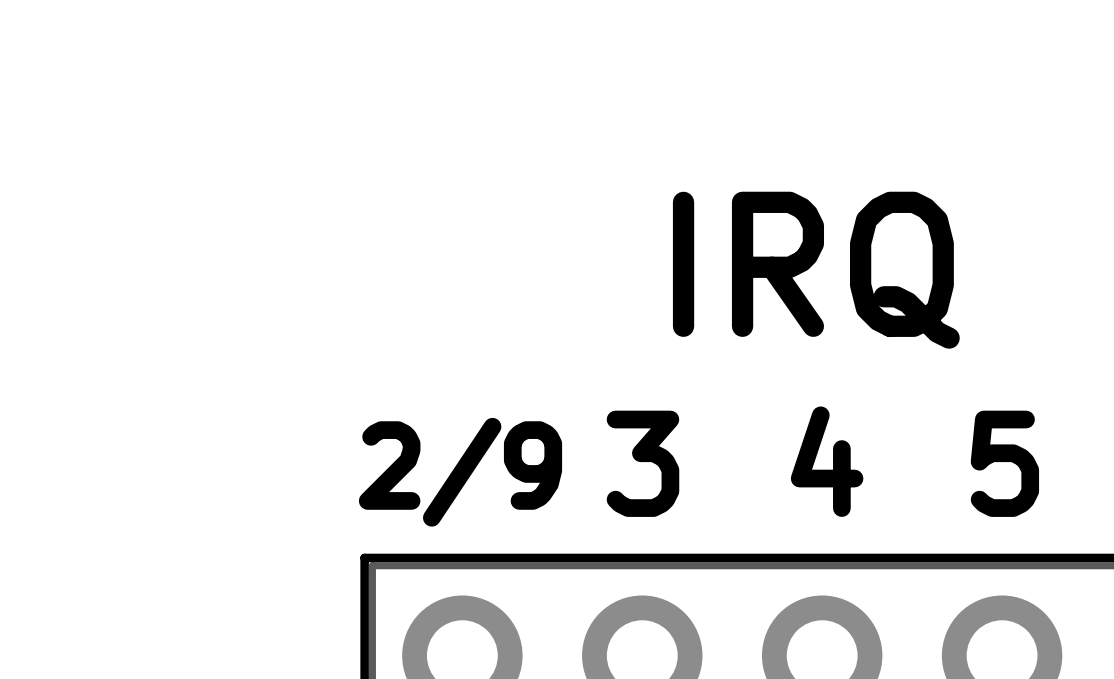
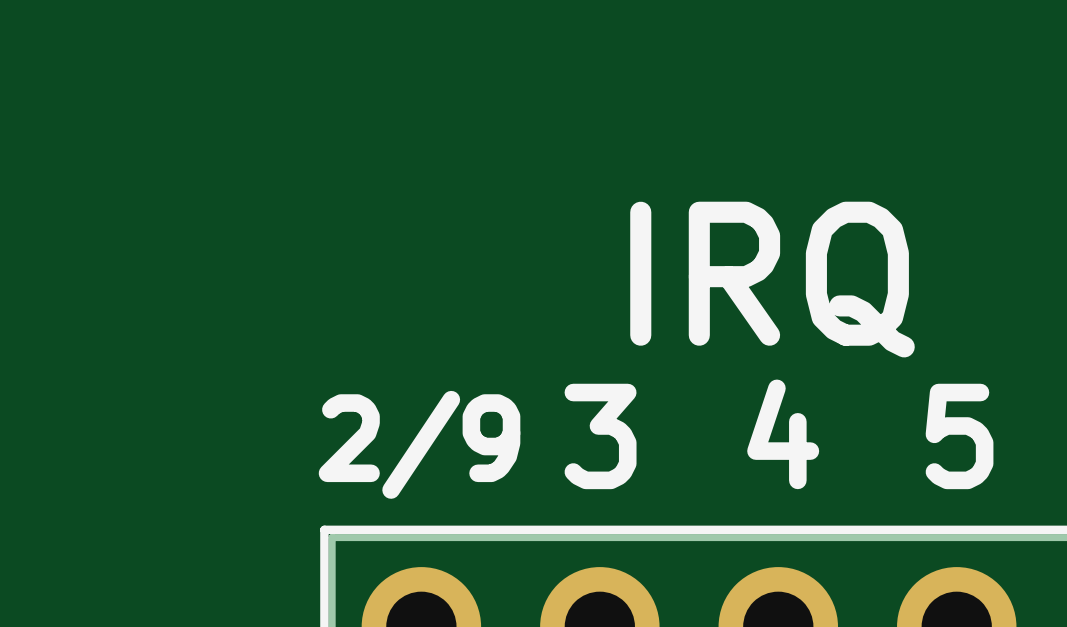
text position: IRQ (816, 270) -> IRQ (772, 279)

